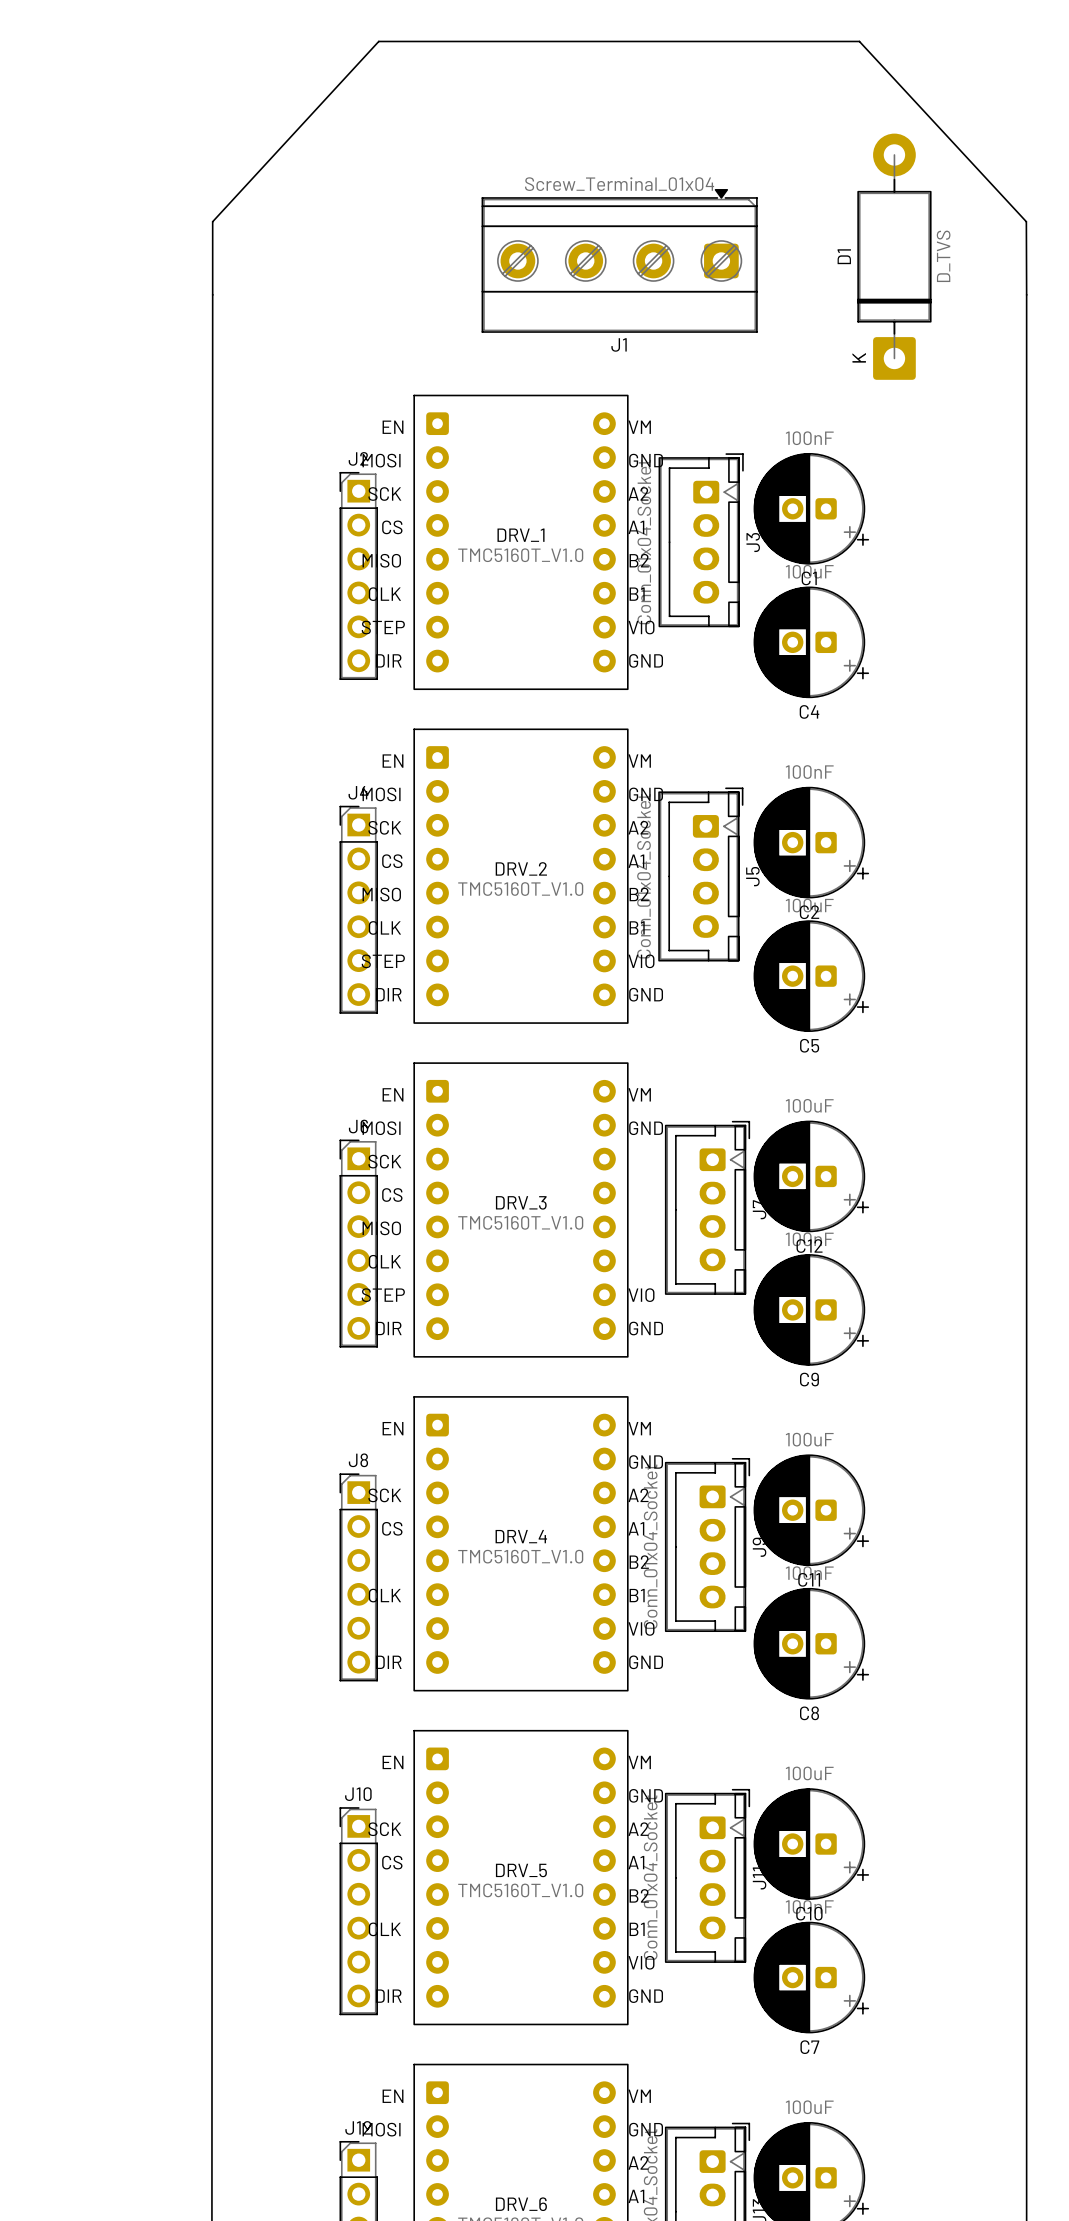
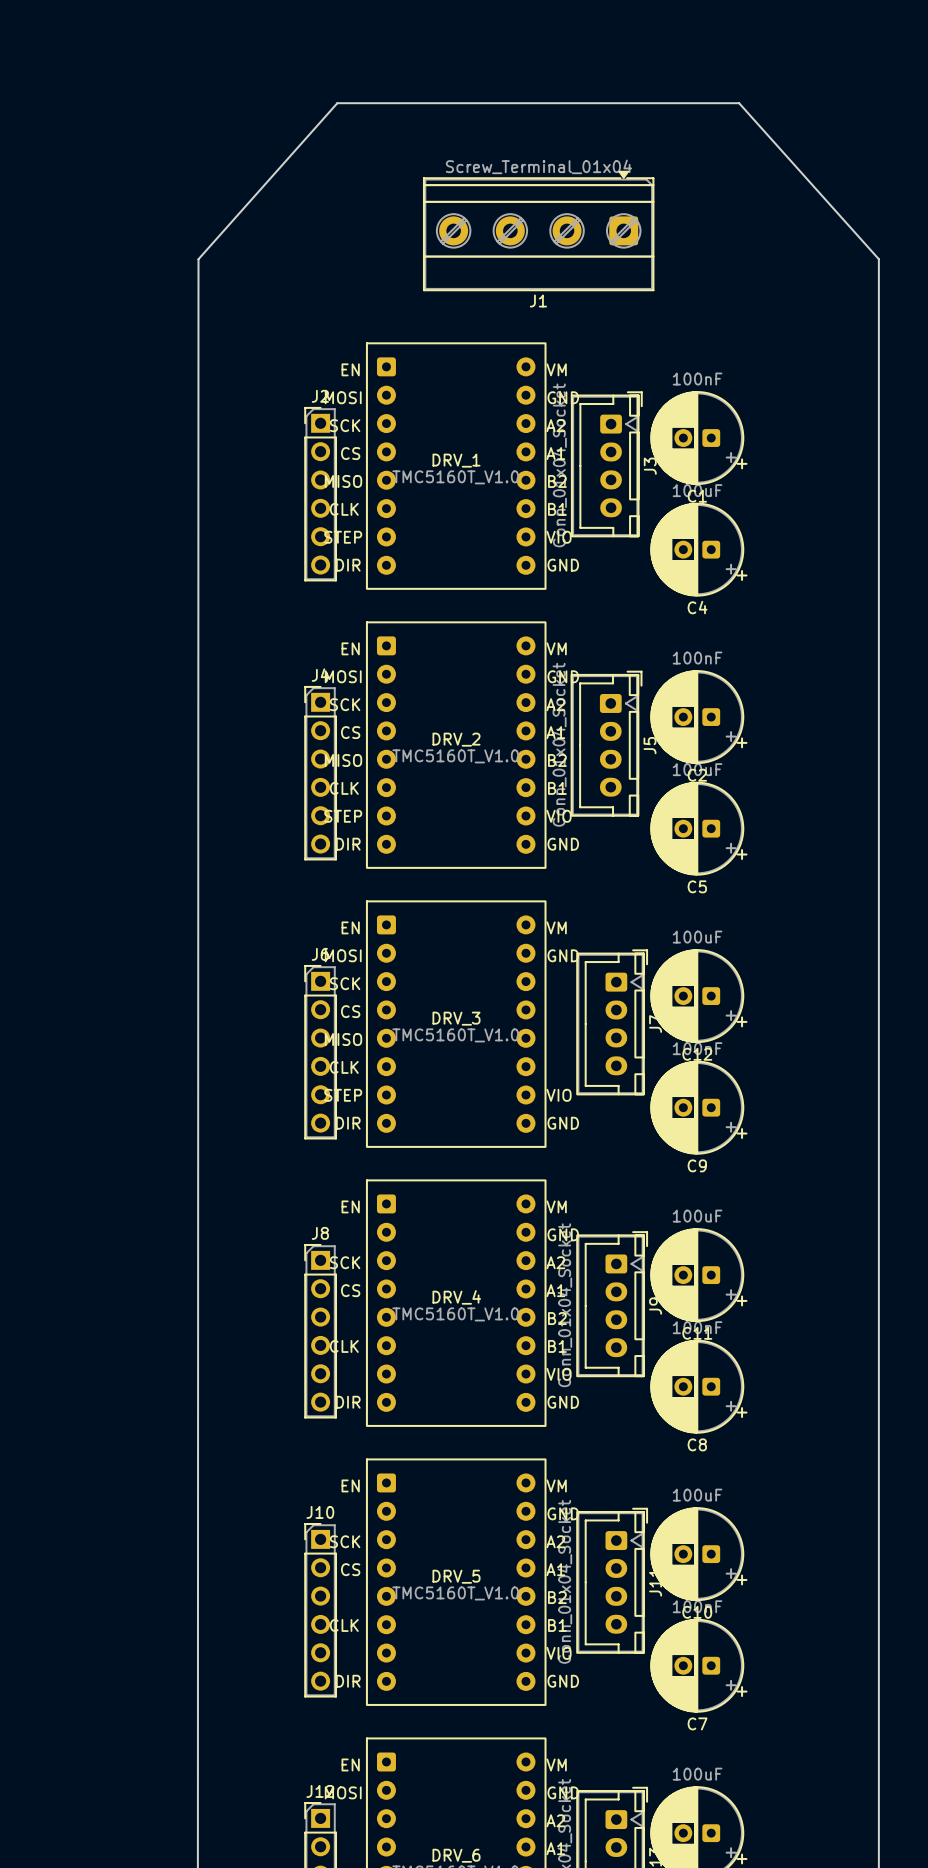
D1: D_TVS (894, 256) -> none
board edge: (212, 294) (212, 221) (378, 41) (859, 41) (1026, 221) (1026, 294) -> (198, 259) (337, 103) (739, 103) (878, 259)

